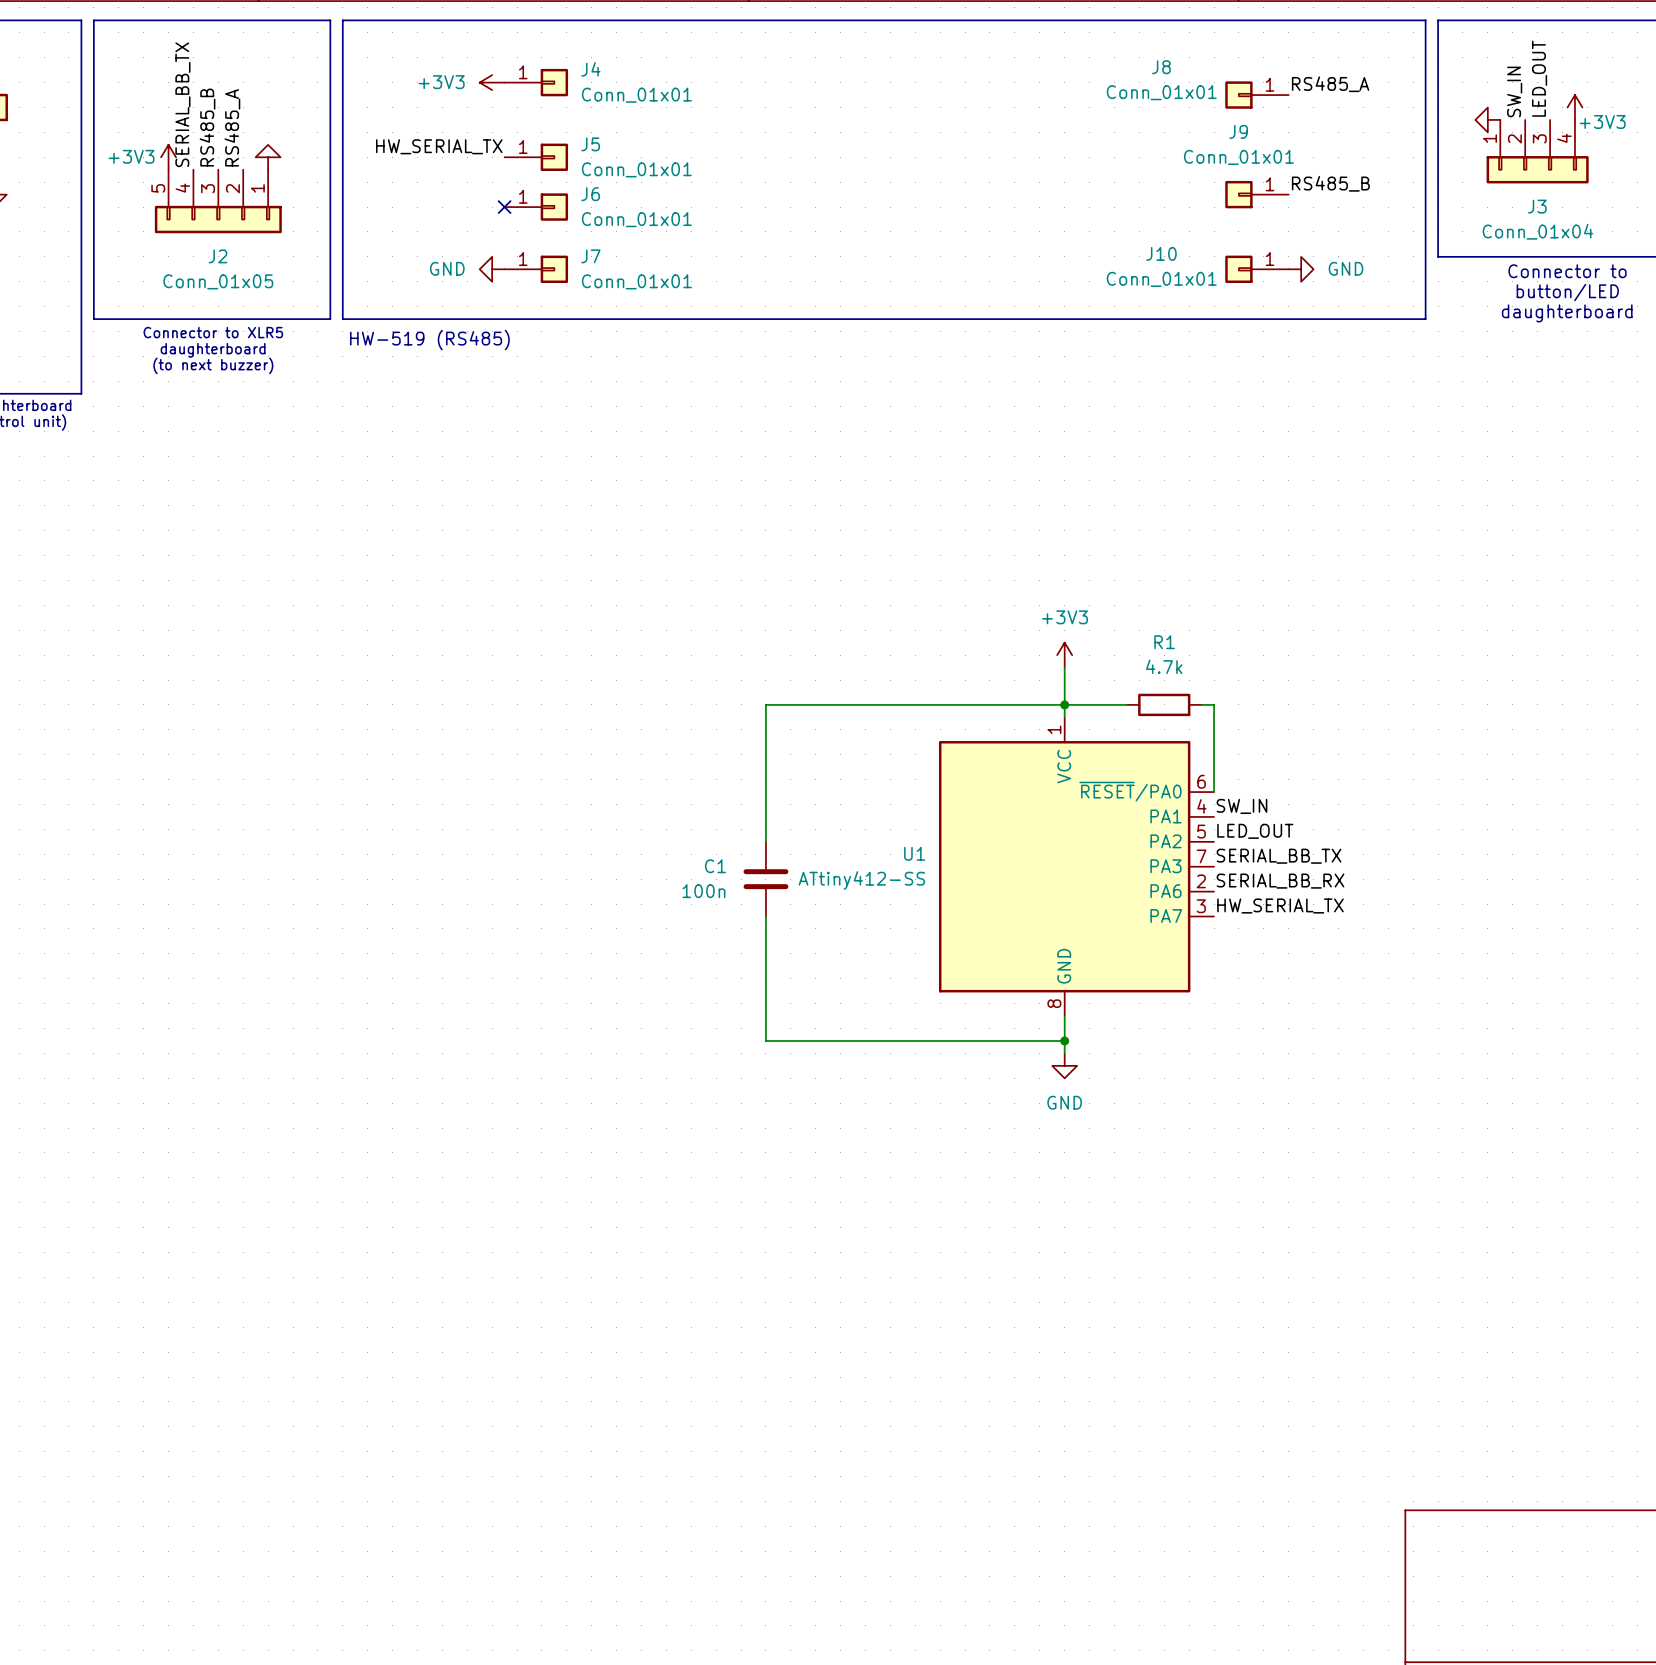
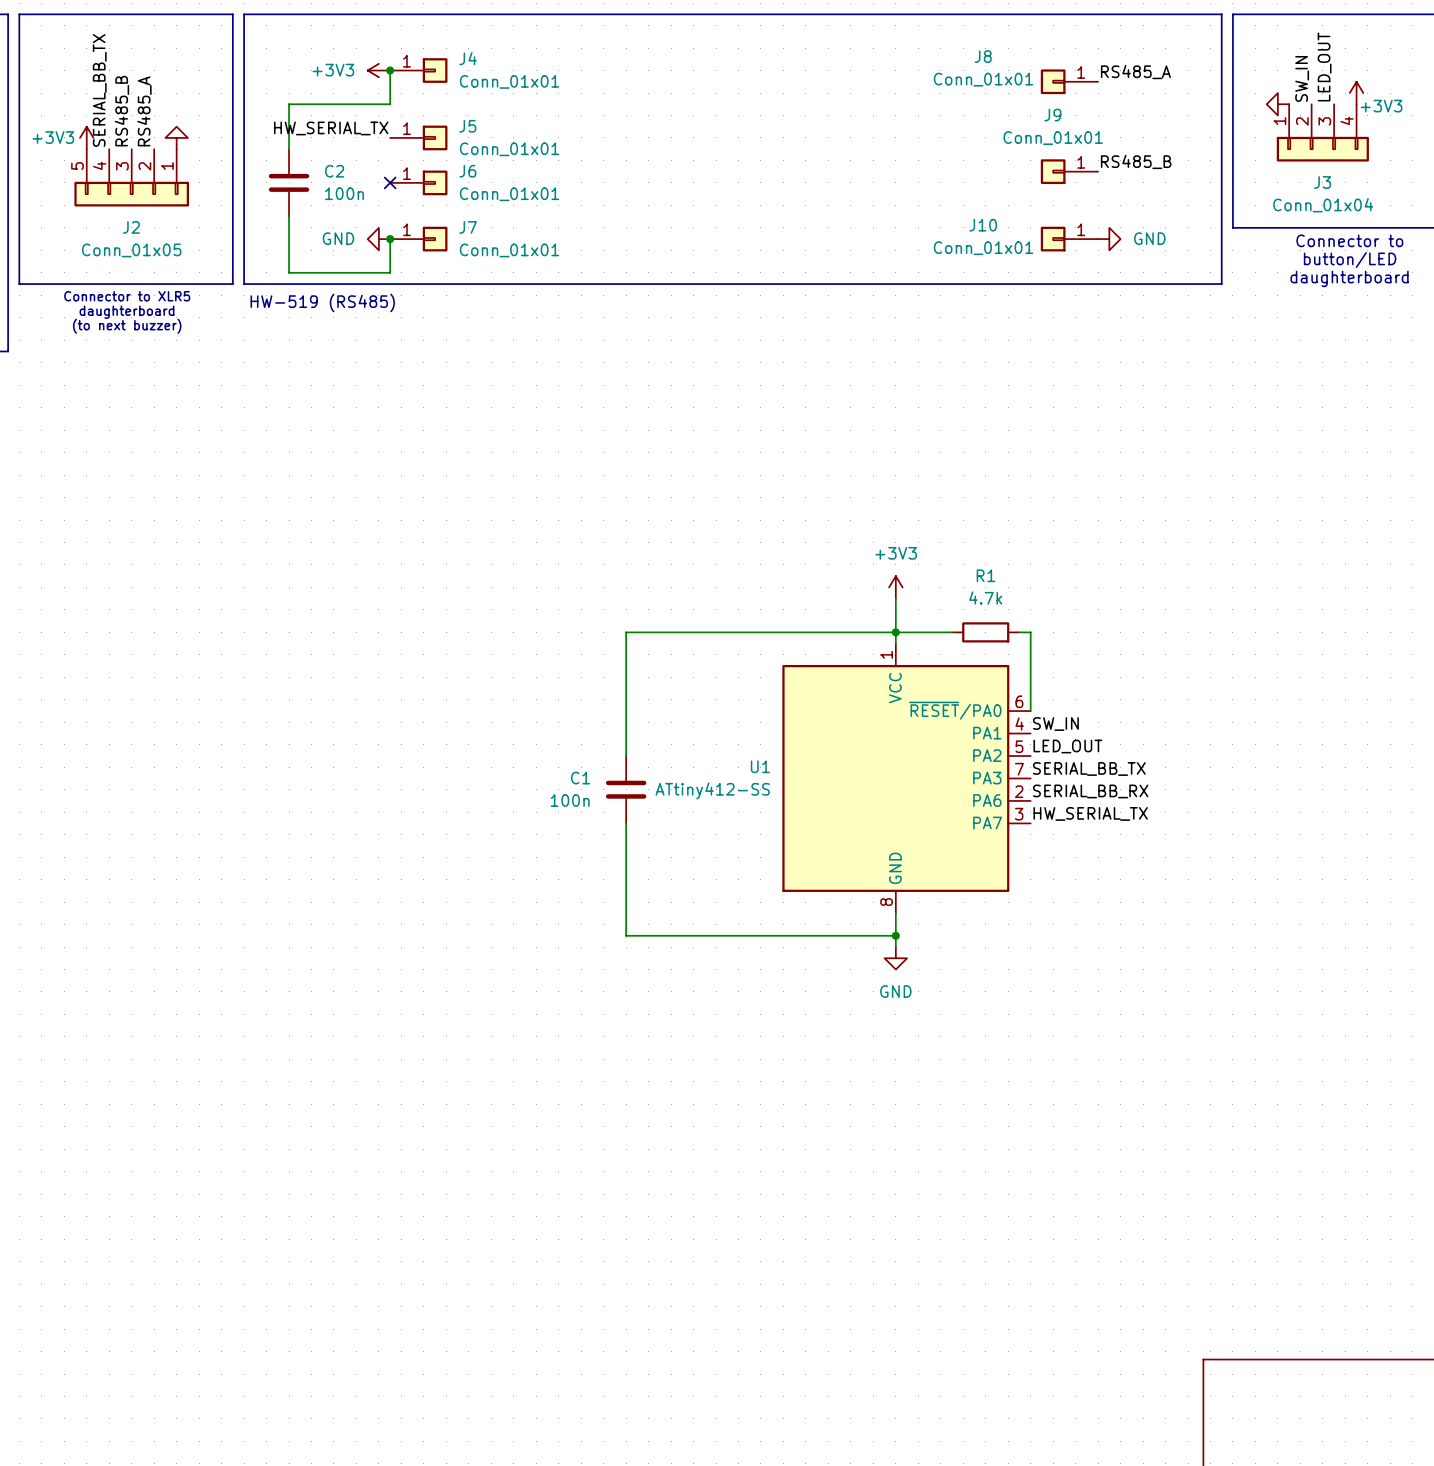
wire: none -> (390, 70) (390, 104) (289, 104) (289, 149)
junction: none -> (390, 70)
C2: none -> 100n (289, 182)
wire: none -> (289, 216) (289, 272) (390, 272) (390, 239)
junction: none -> (390, 239)

